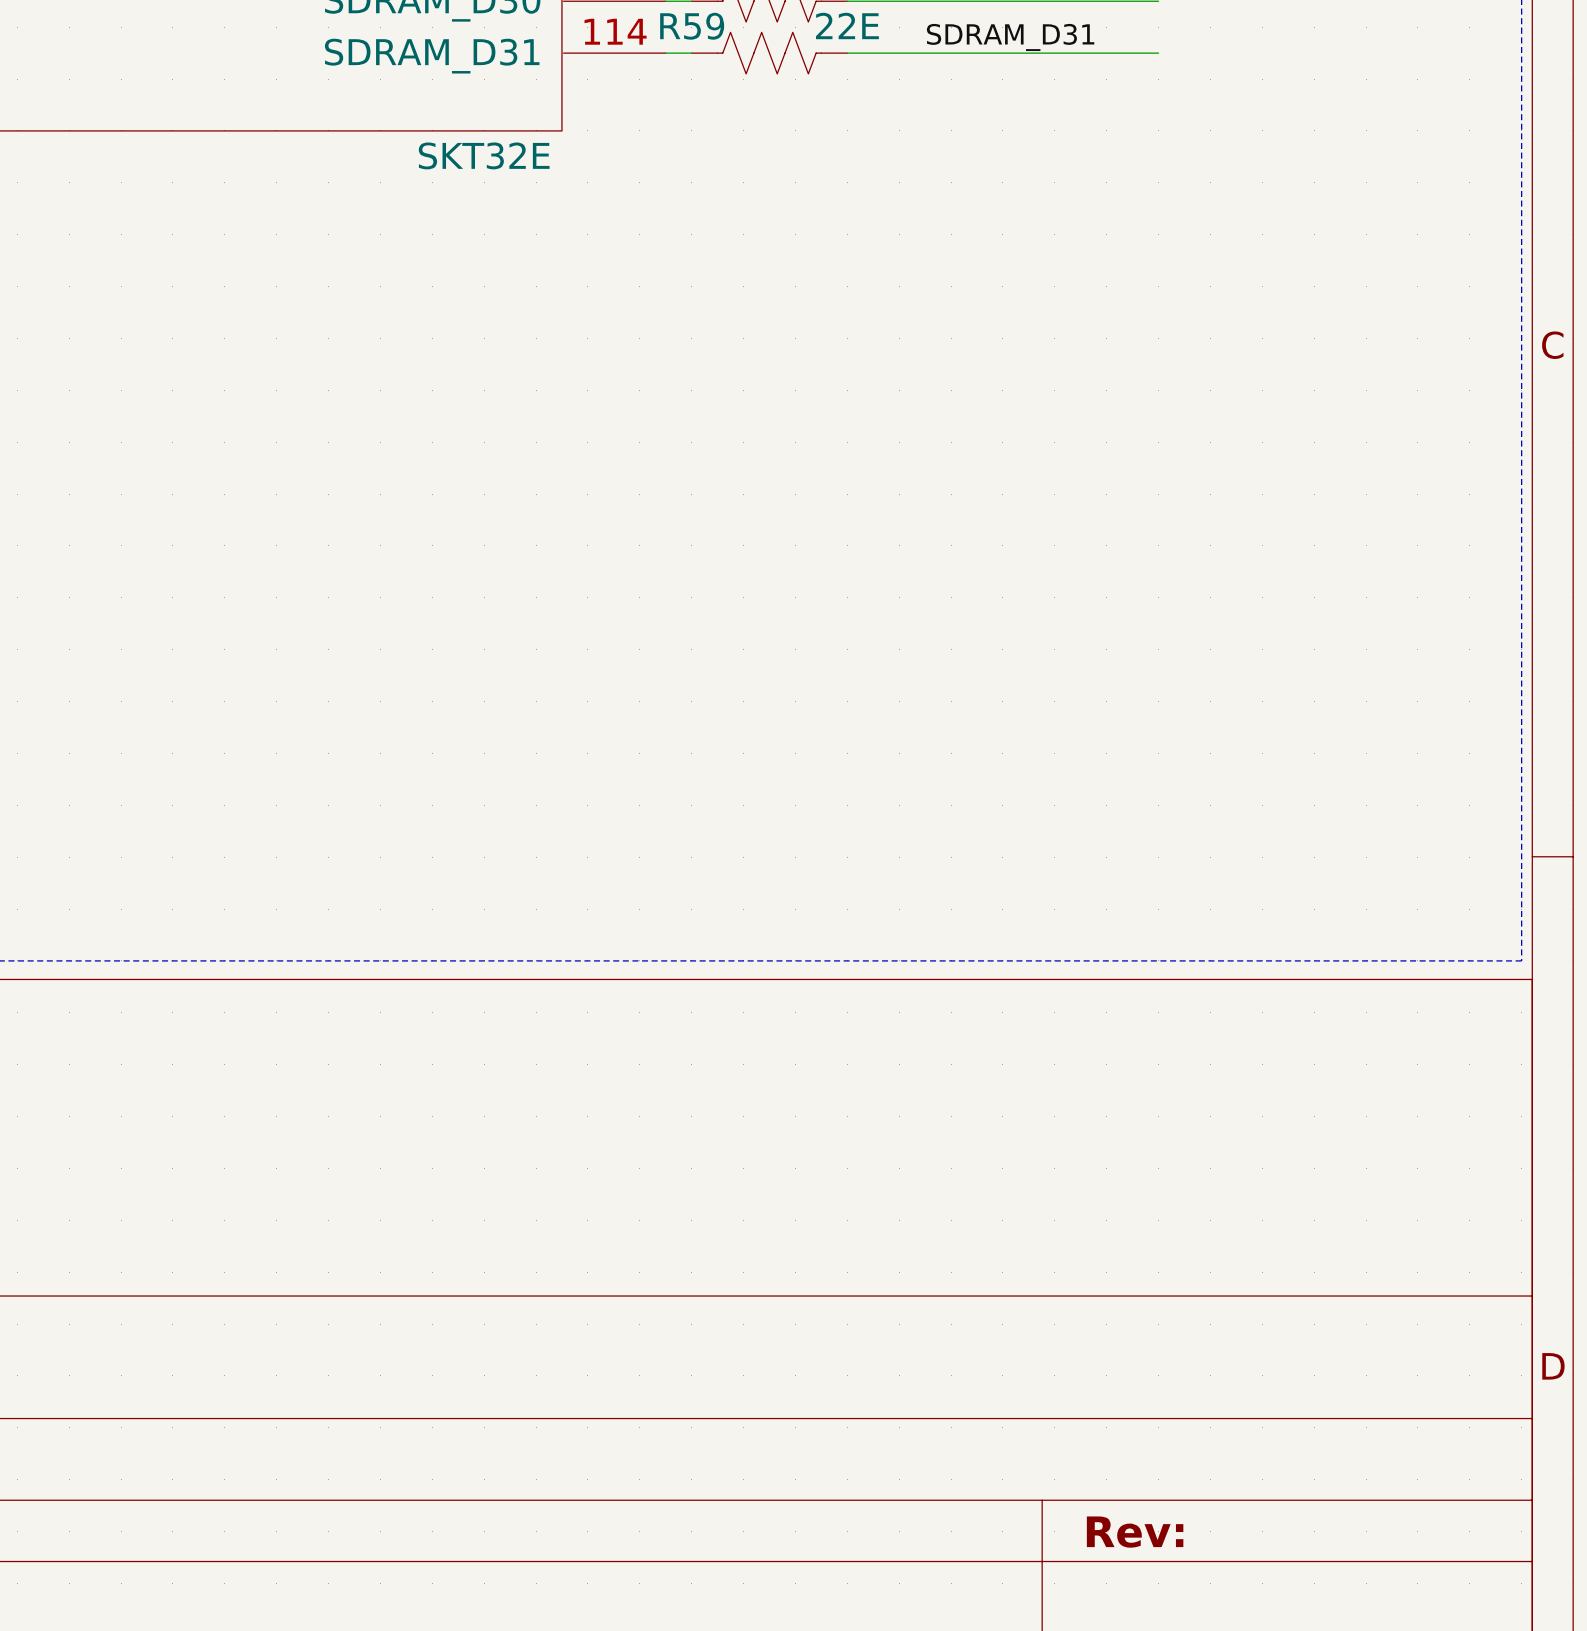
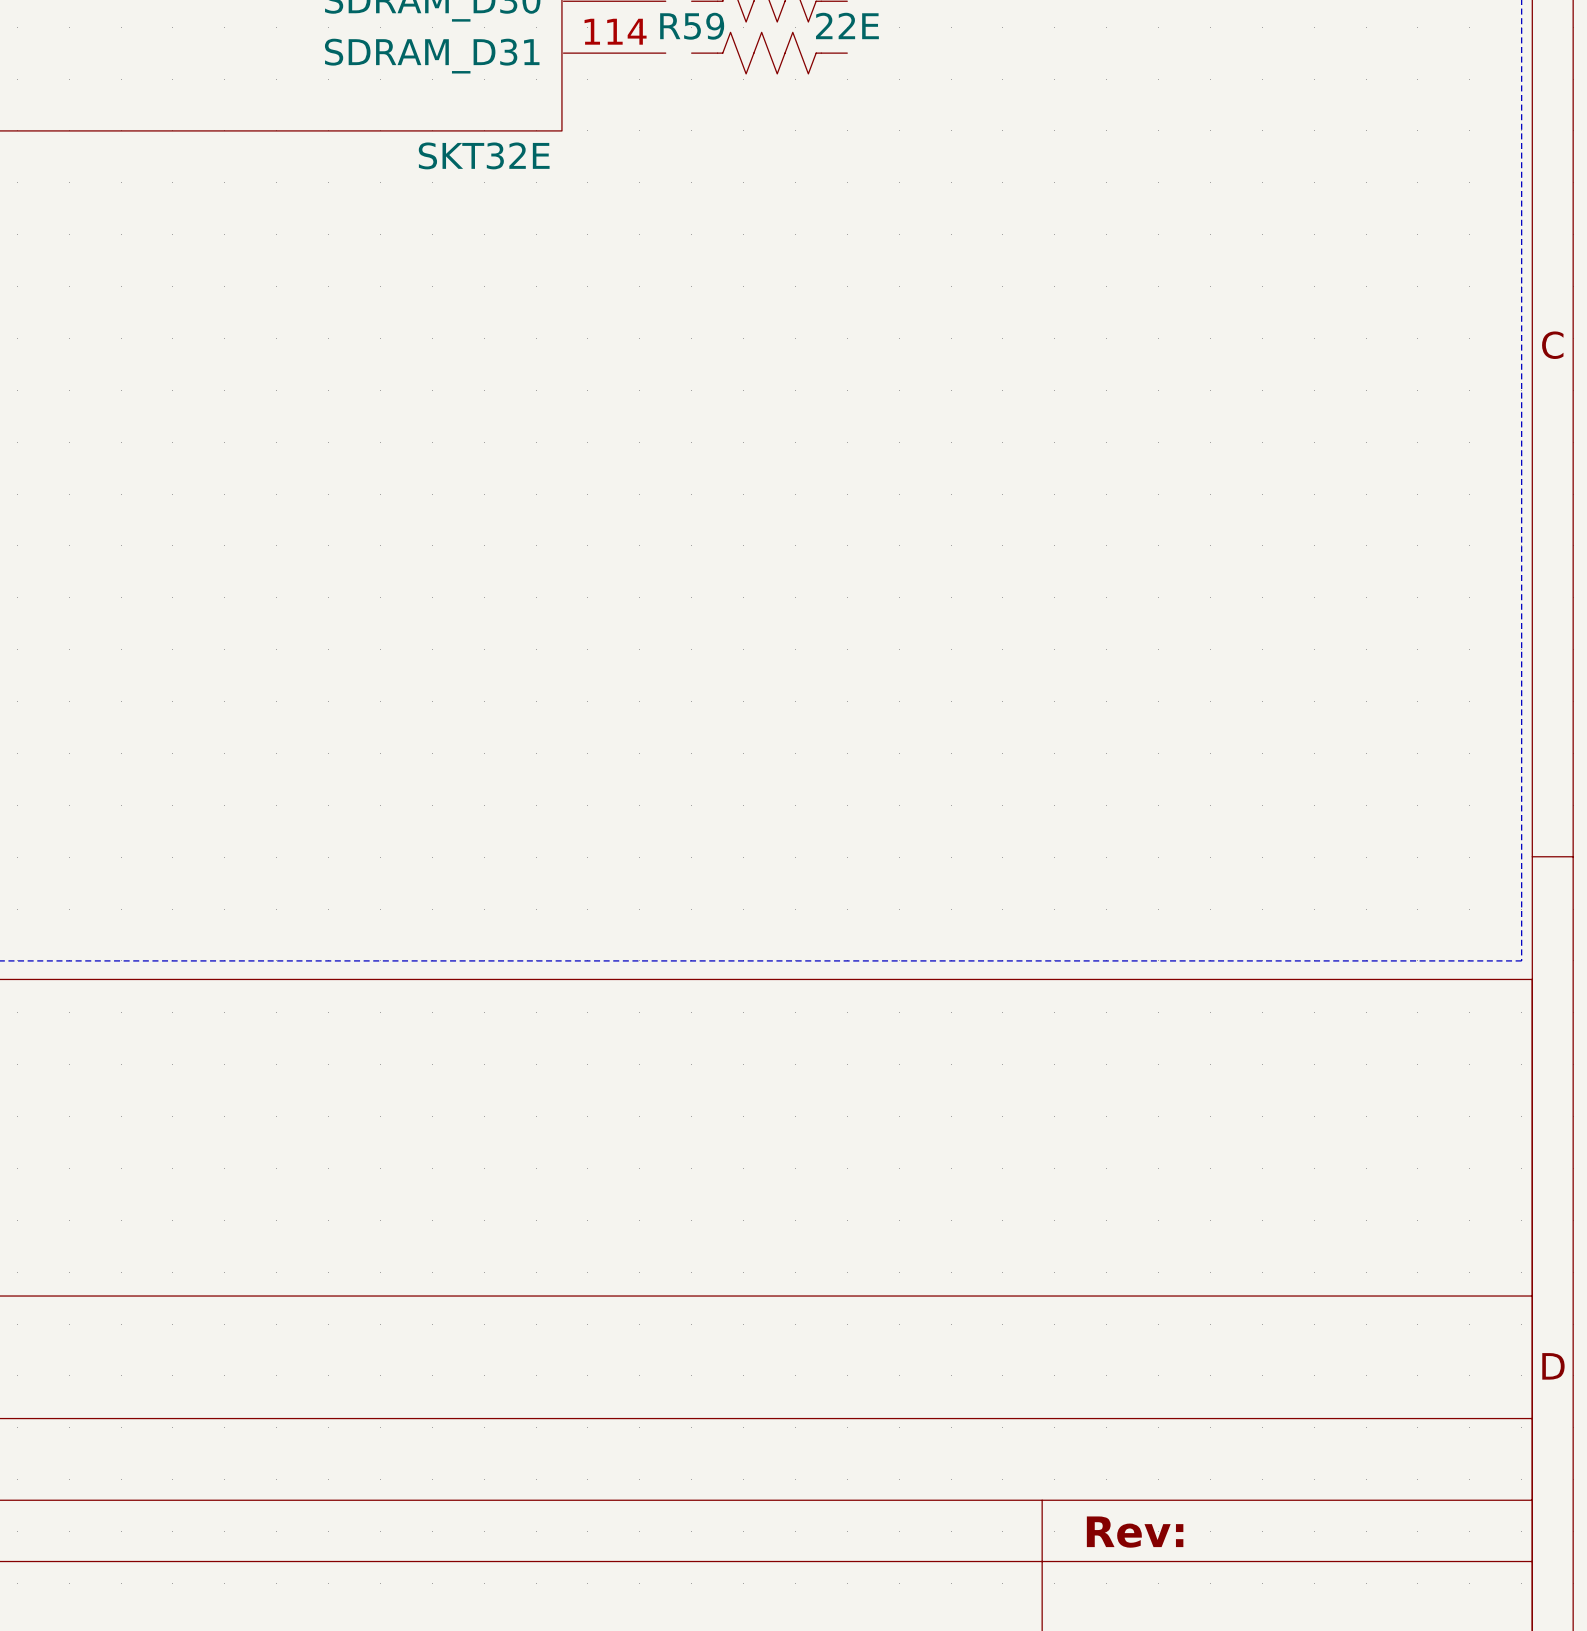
wire: (665, 1) (691, 1) -> none
wire: (847, 1) (1158, 1) -> none
label: SDRAM_D31 (1010, 37) -> none
wire: (665, 53) (691, 53) -> none
wire: (847, 53) (1158, 53) -> none

